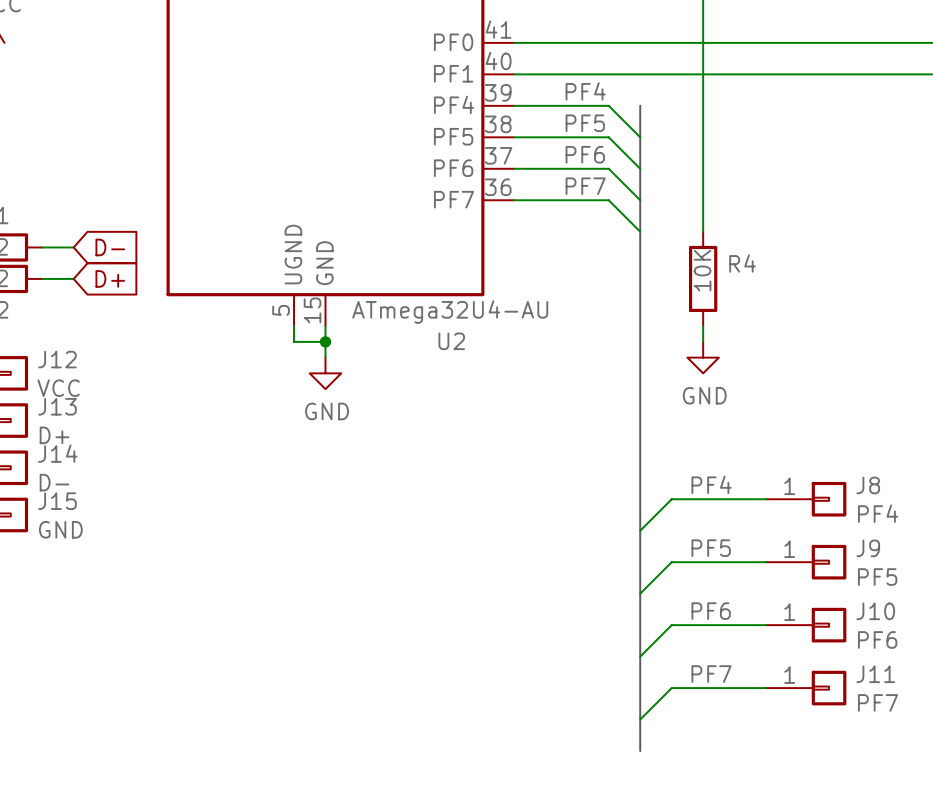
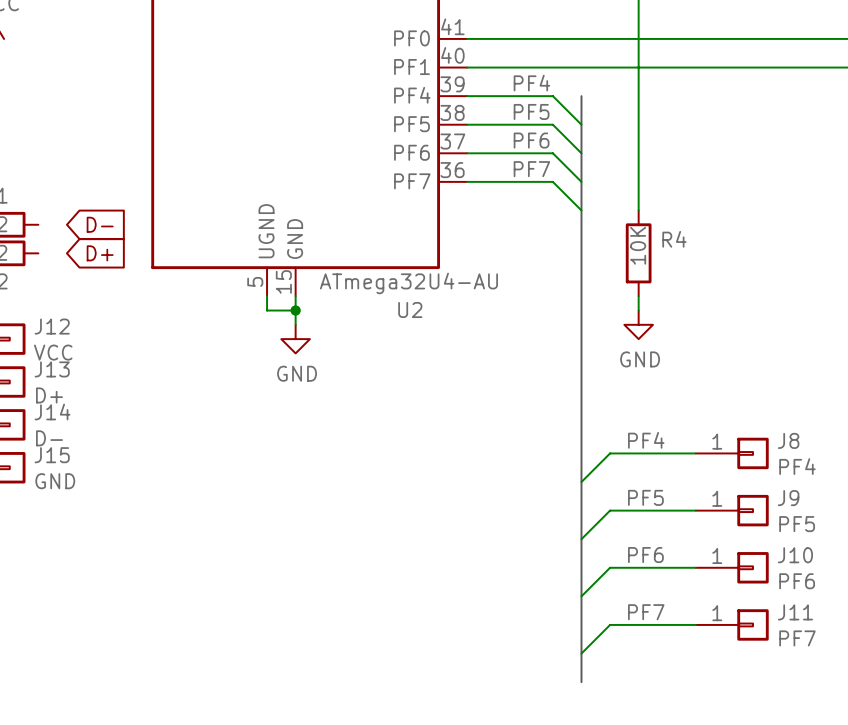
wire: (42, 247) (73, 247) -> none
wire: (42, 278) (73, 278) -> none

